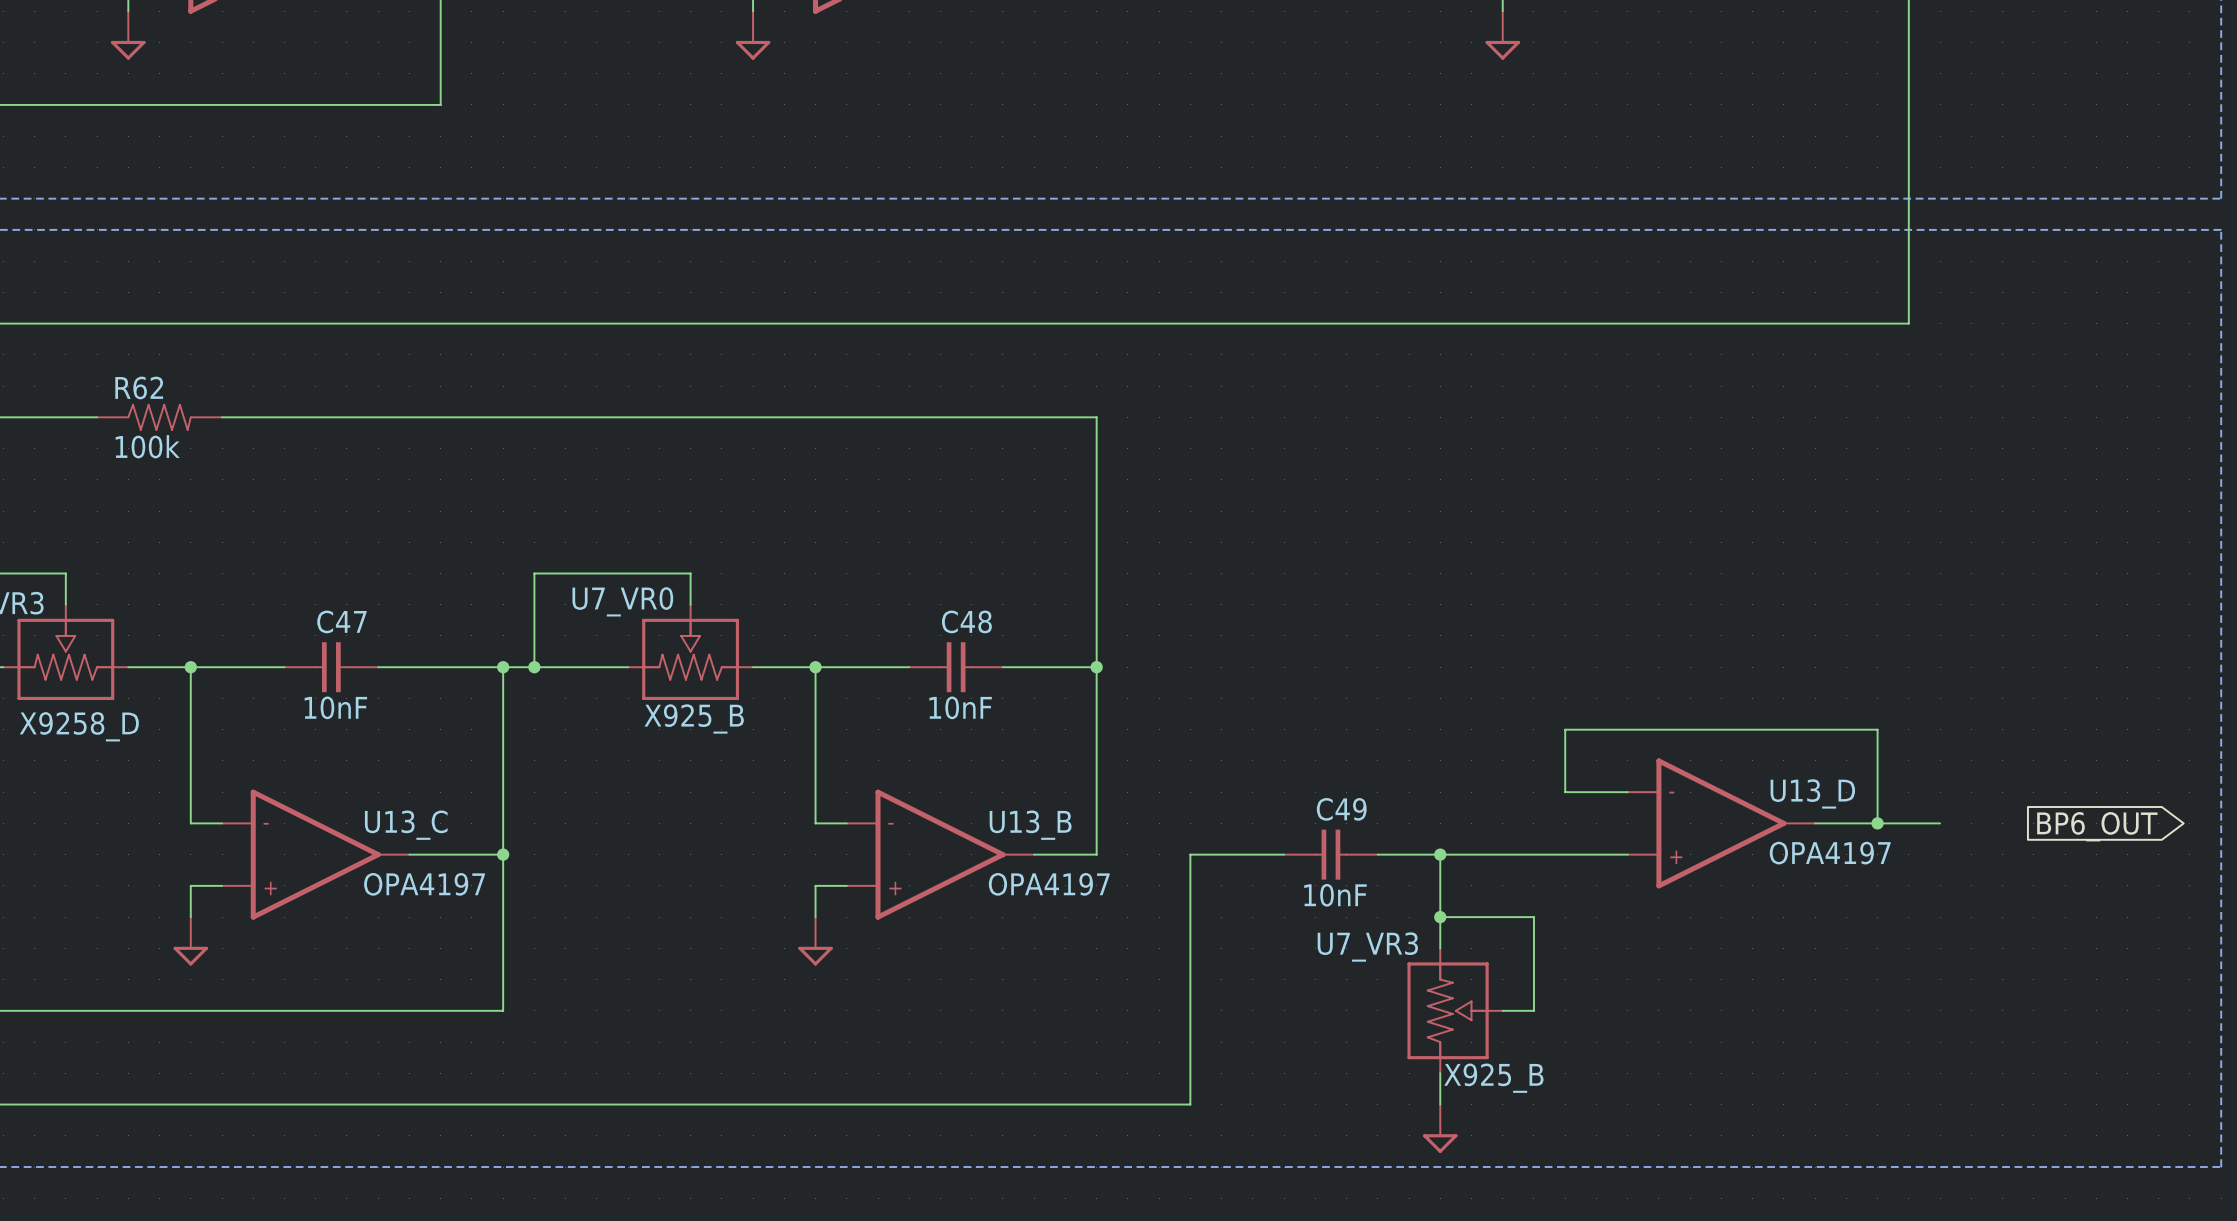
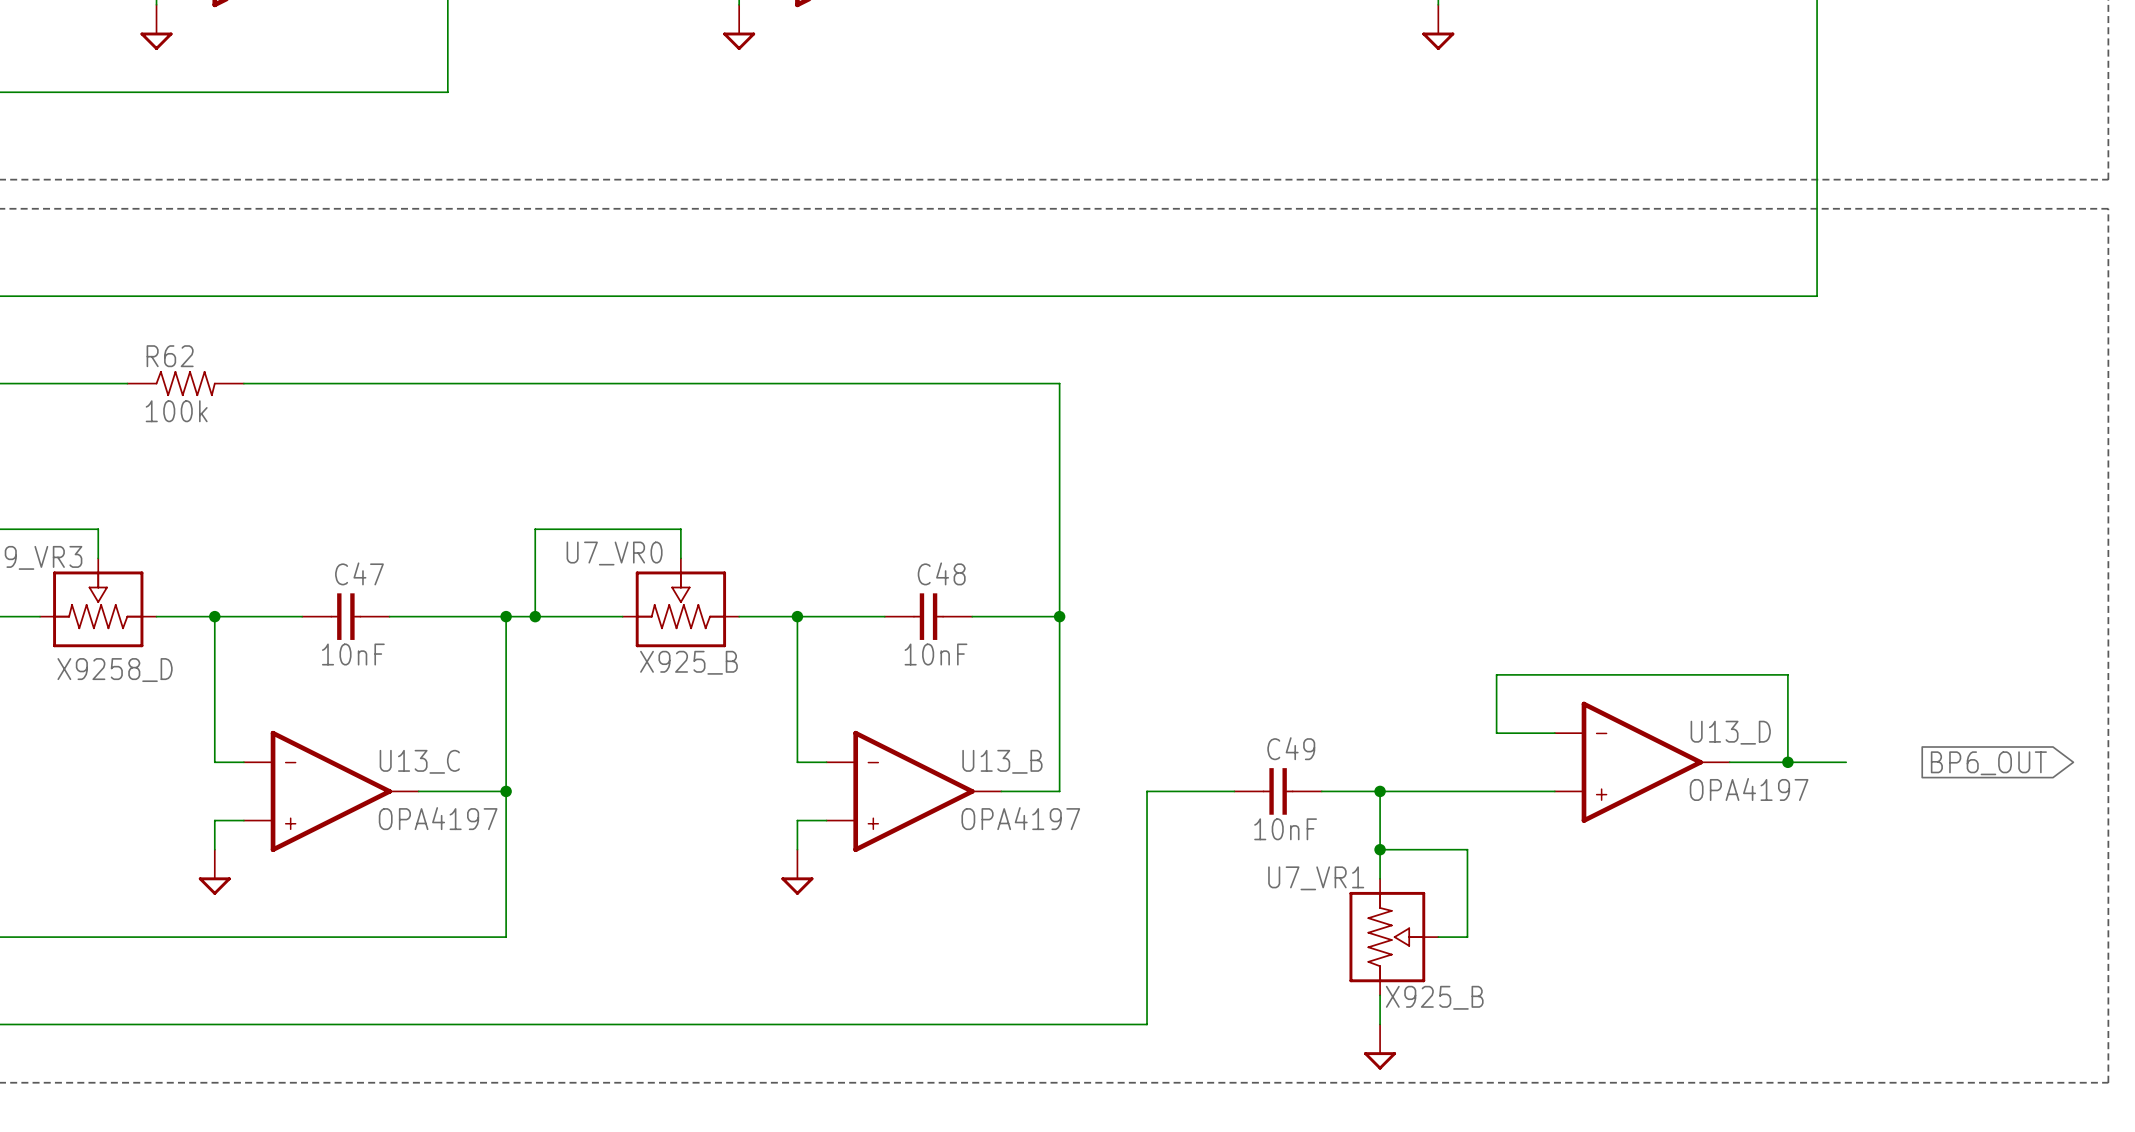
U7_VR3 name: U7_VR3 (1367, 947) -> U7_VR1 (1316, 878)

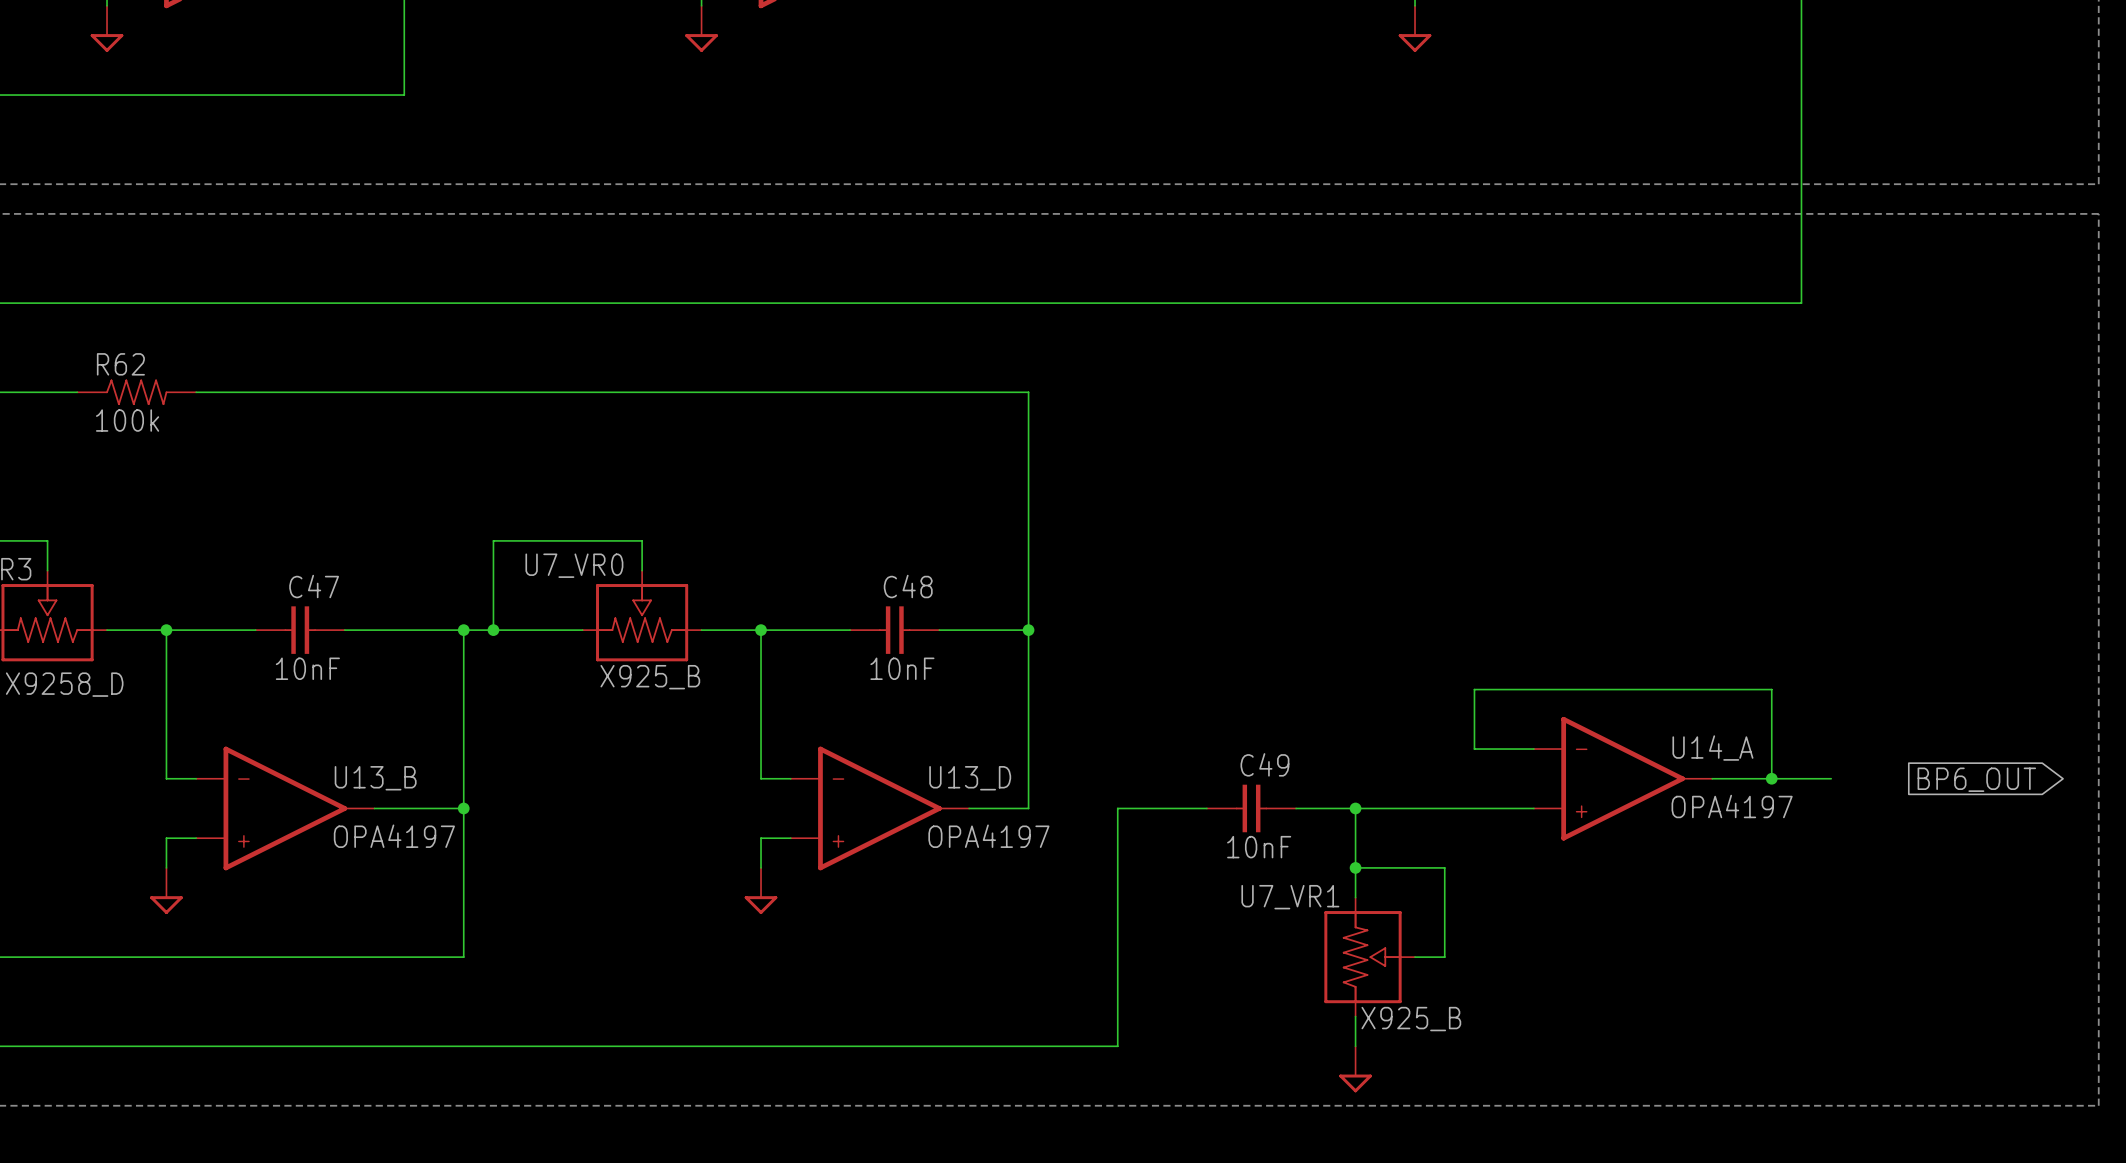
U13_D name: U13_D (1730, 732) -> U14_A (1712, 748)
U13_C name: U13_C (419, 761) -> U13_B (375, 778)
U13_B name: U13_B (1002, 761) -> U13_D (970, 778)

